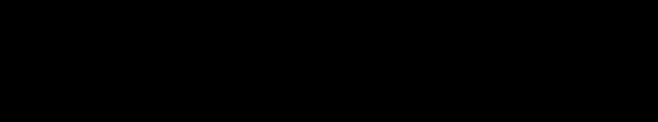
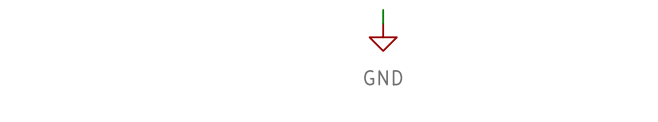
wire: none -> (383, 9) (383, 23)
power symbol: none -> GND (383, 37)

